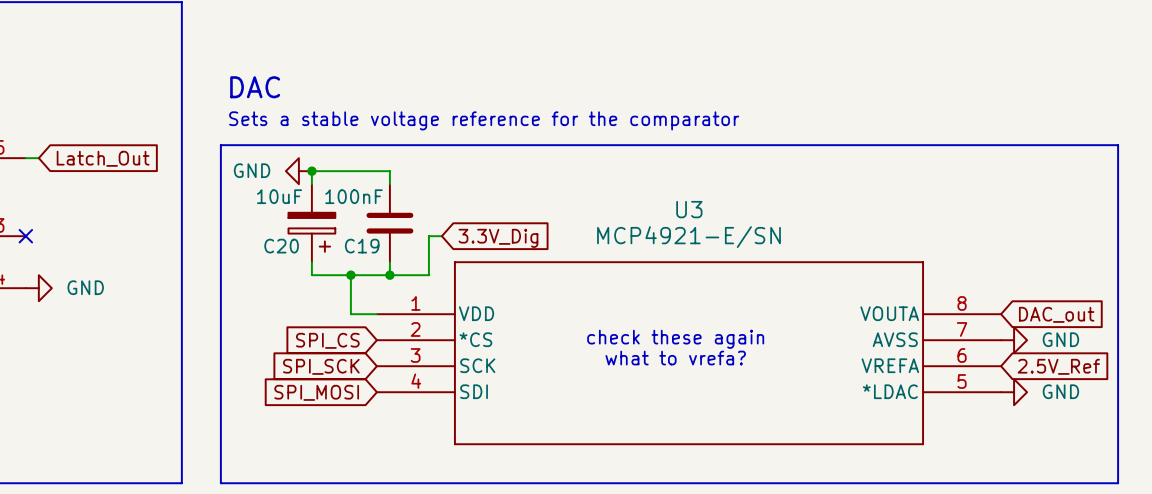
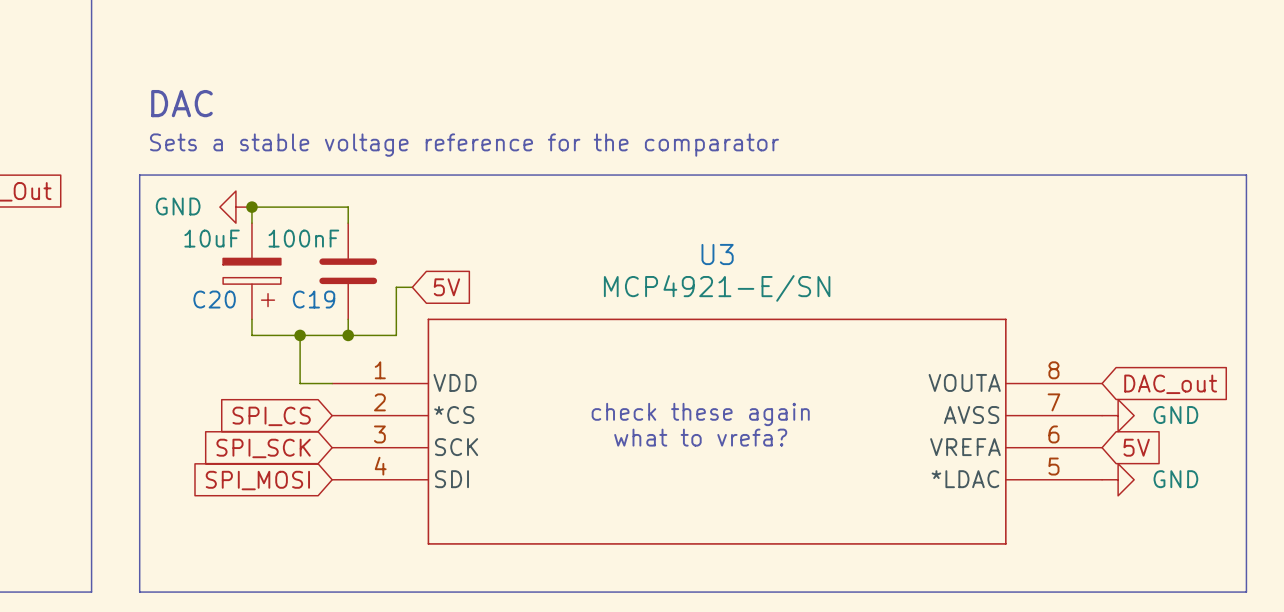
global label: 3.3V_Dig (498, 238) -> 5V (446, 287)
global label: 2.5V_Ref (1058, 366) -> 5V (1136, 447)

